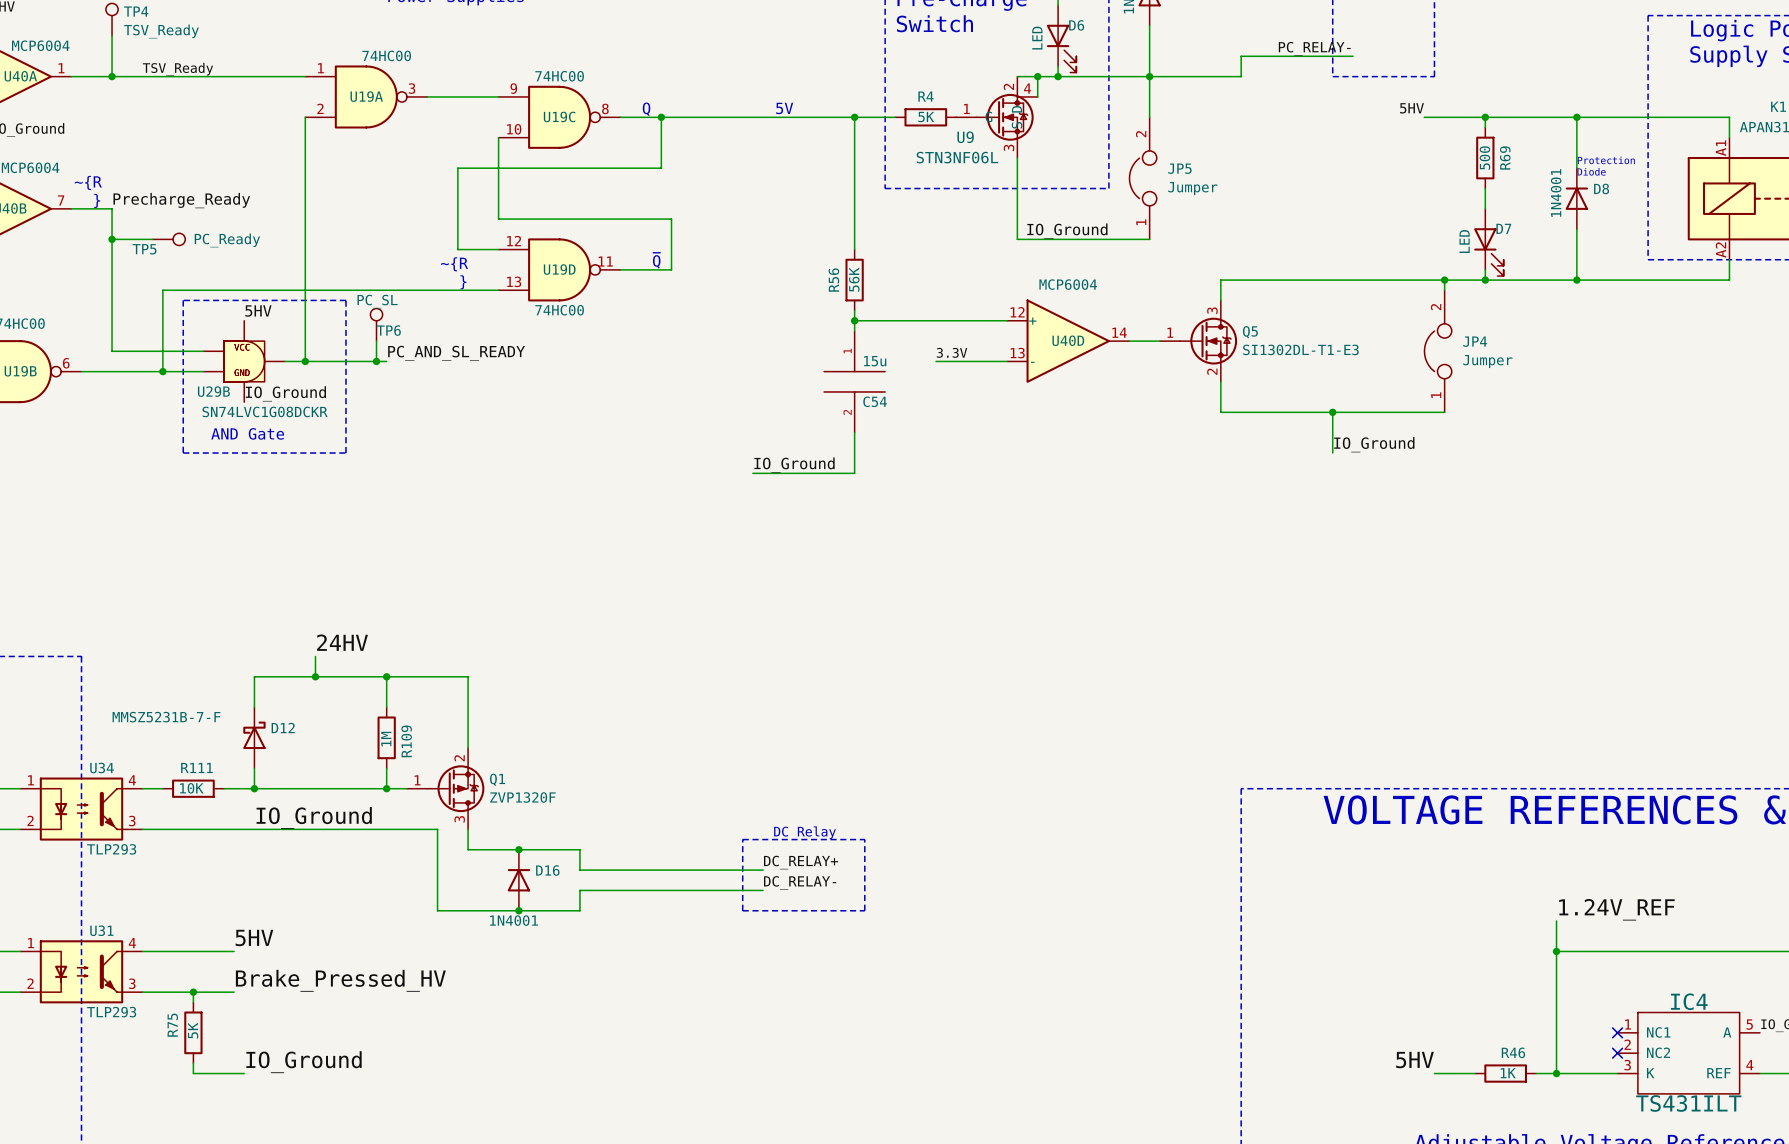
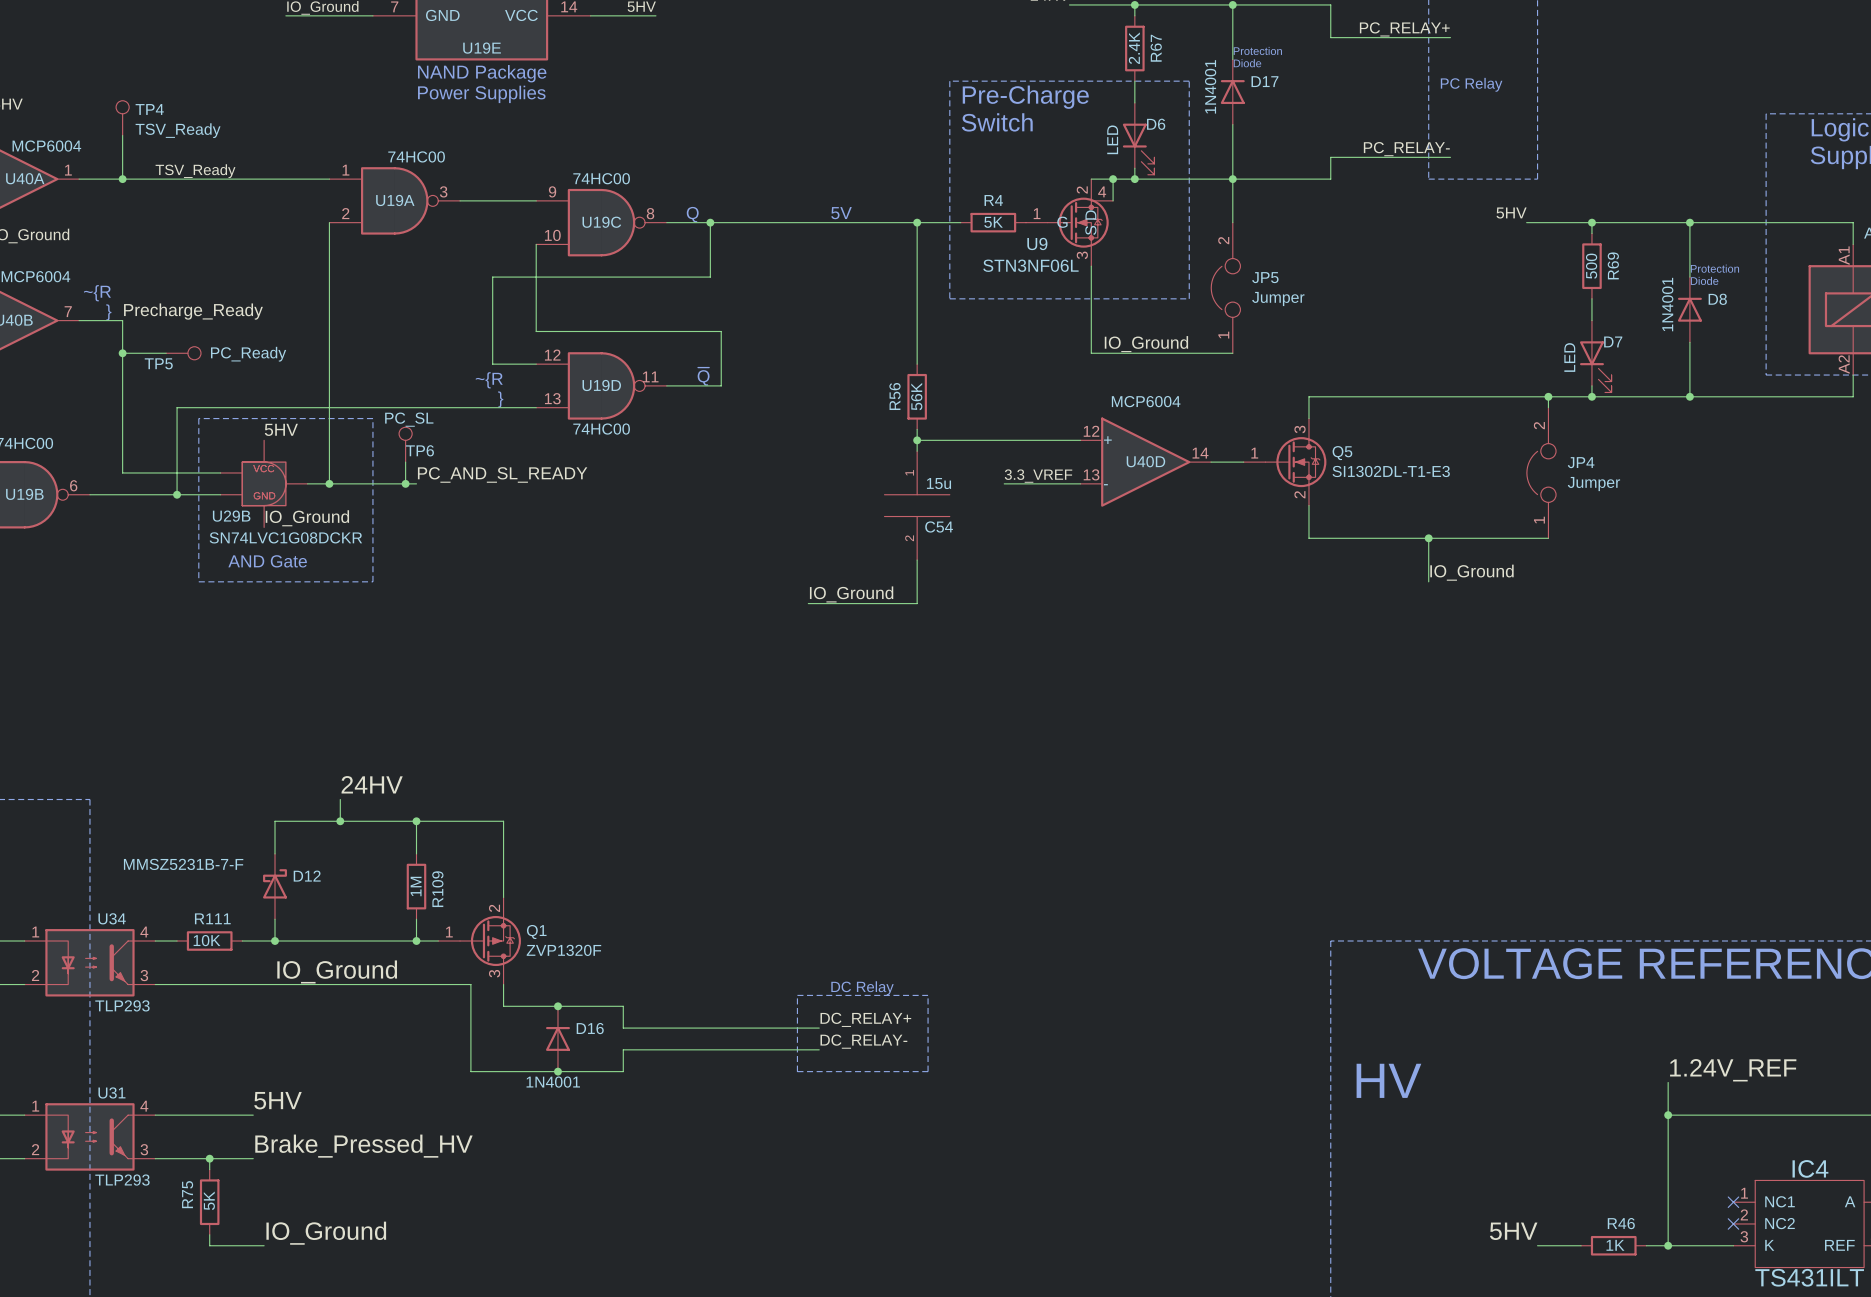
label: 3.3V (952, 352) -> 3.3_VREF (1038, 476)
text: none -> HV (1388, 1080)

